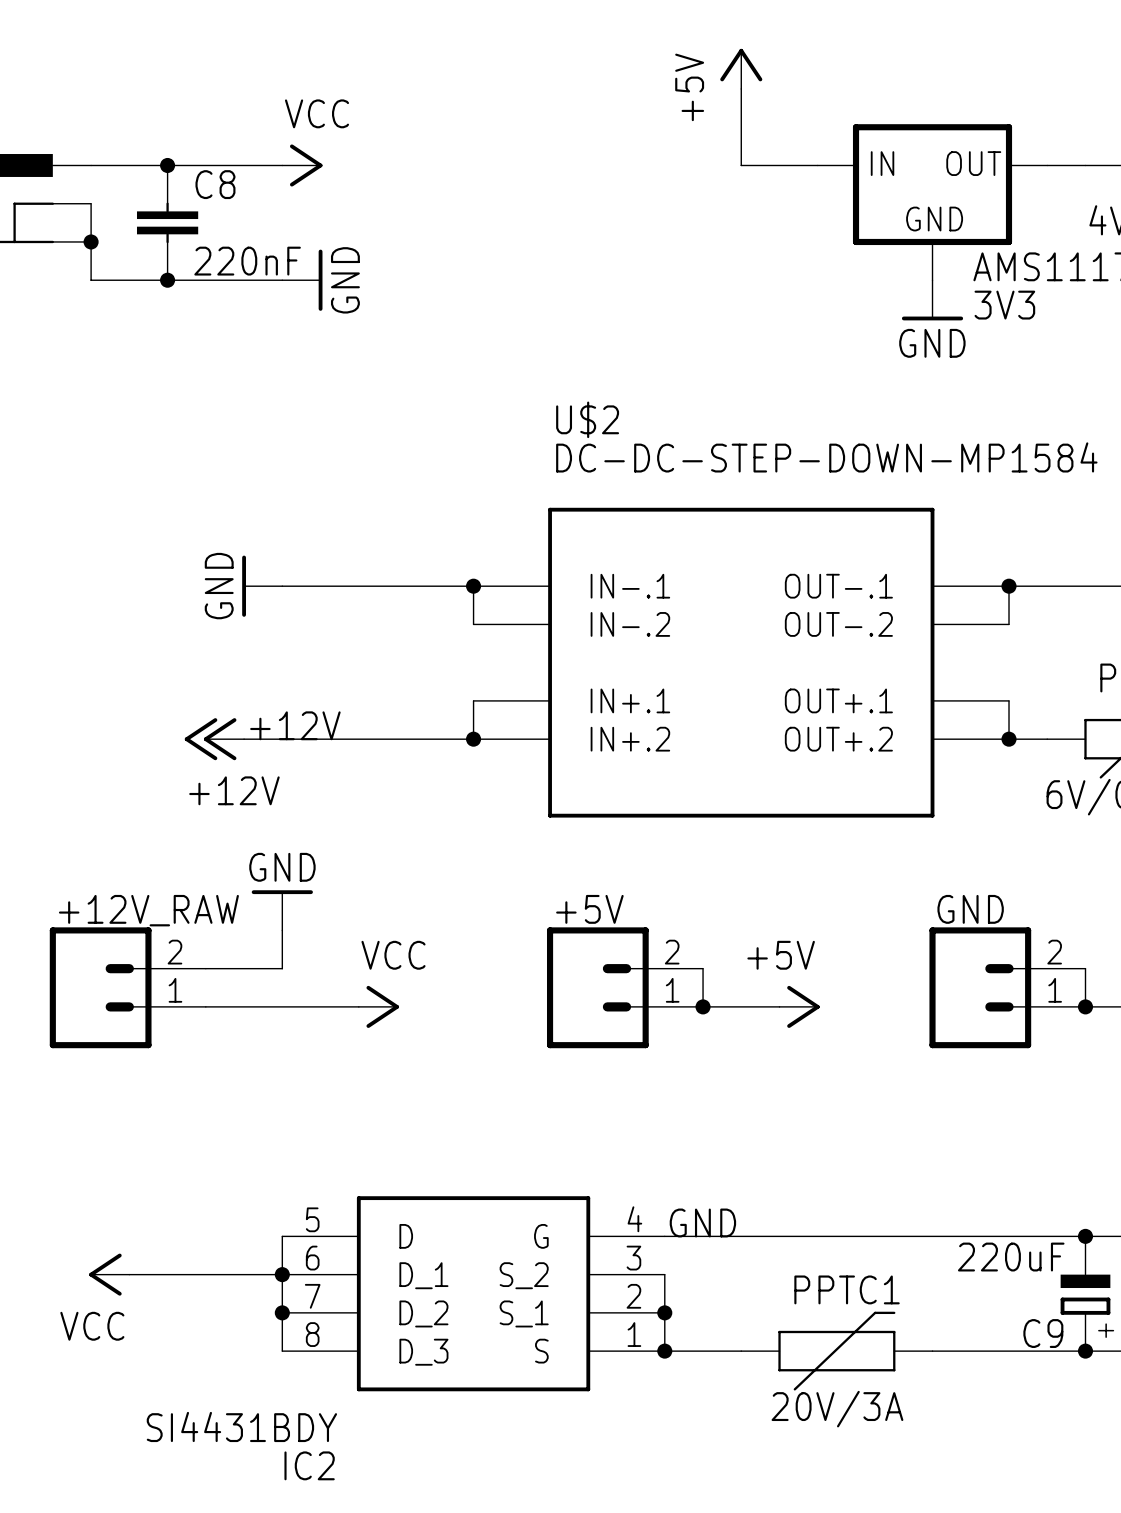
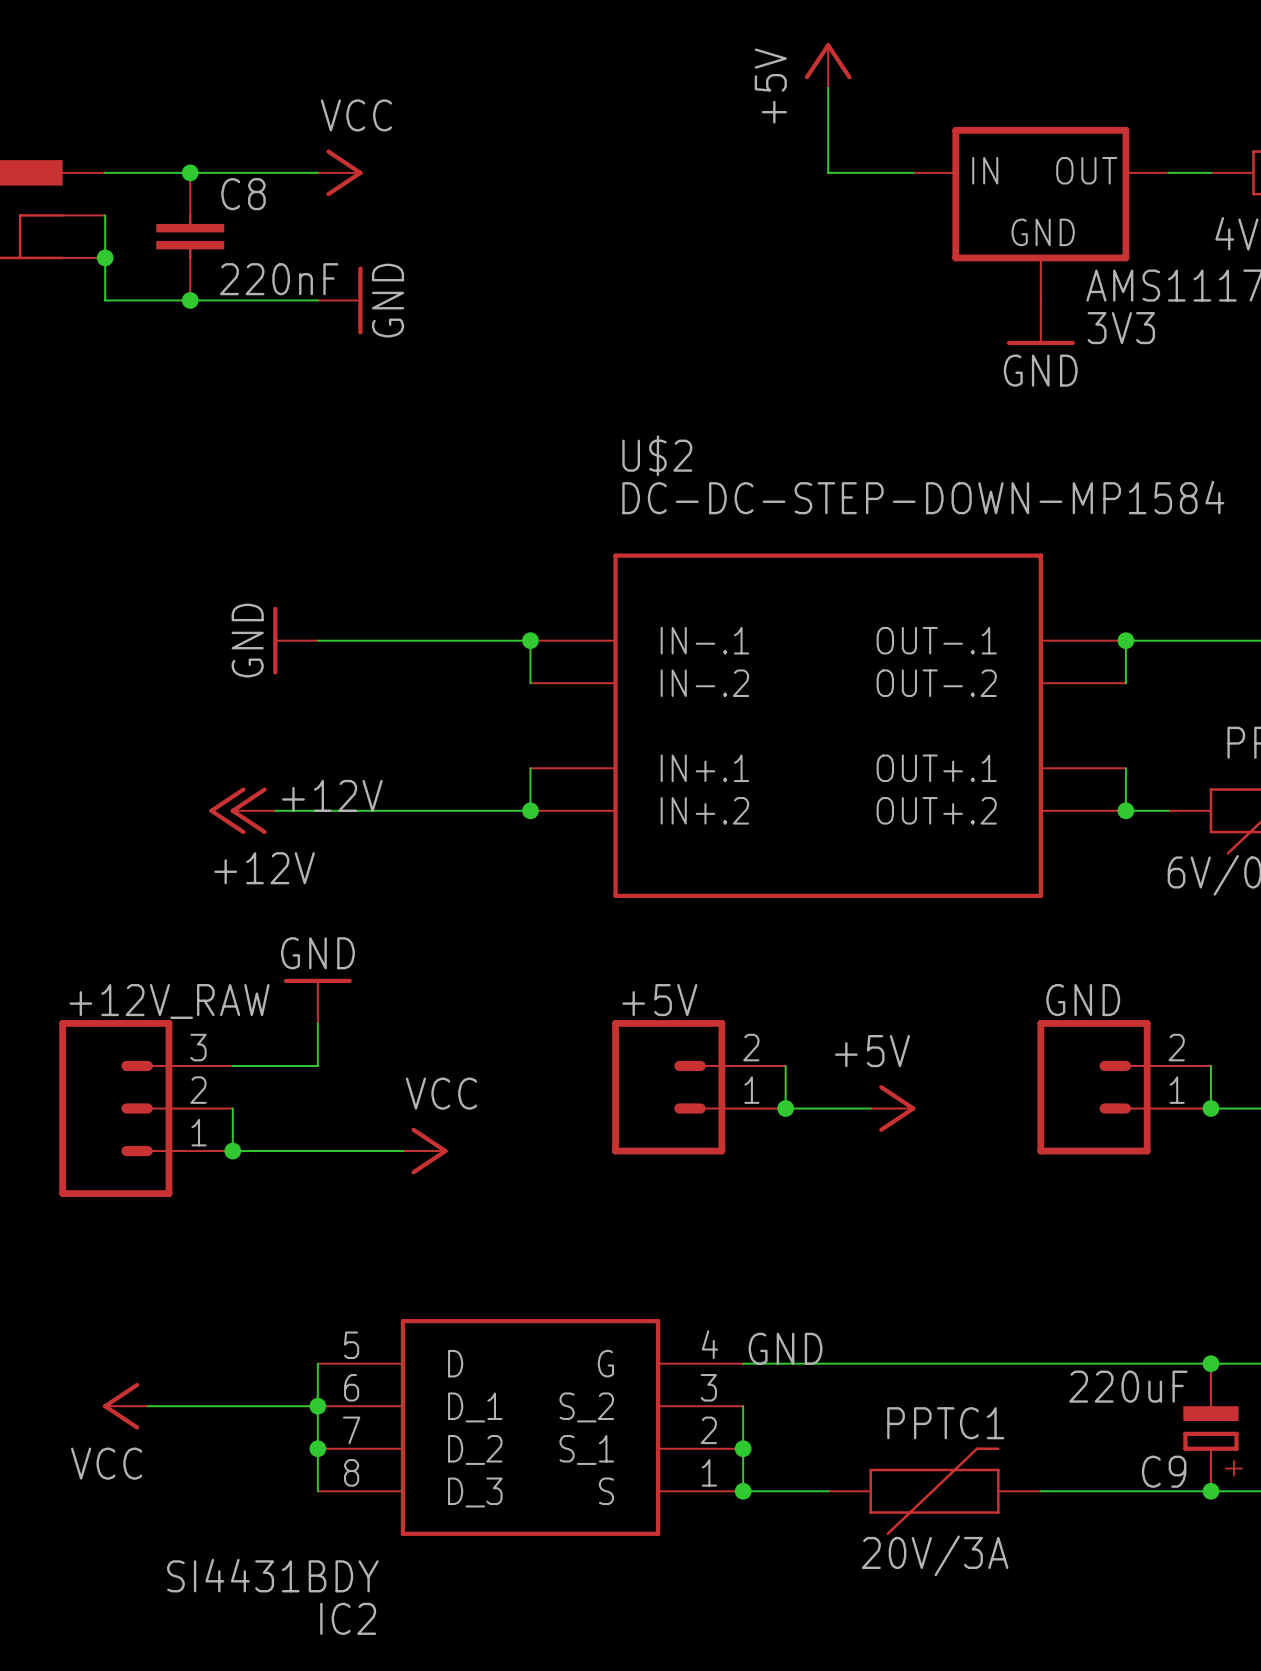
+12V_RAW symbol: [49, 927, 206, 1049] -> [59, 1020, 233, 1197]
wire: (205, 1006) (358, 1006) -> (232, 1108) (232, 1151) (402, 1151)
power symbol position: VCC (378, 1006) -> VCC (425, 1151)
junction: none -> (232, 1151)

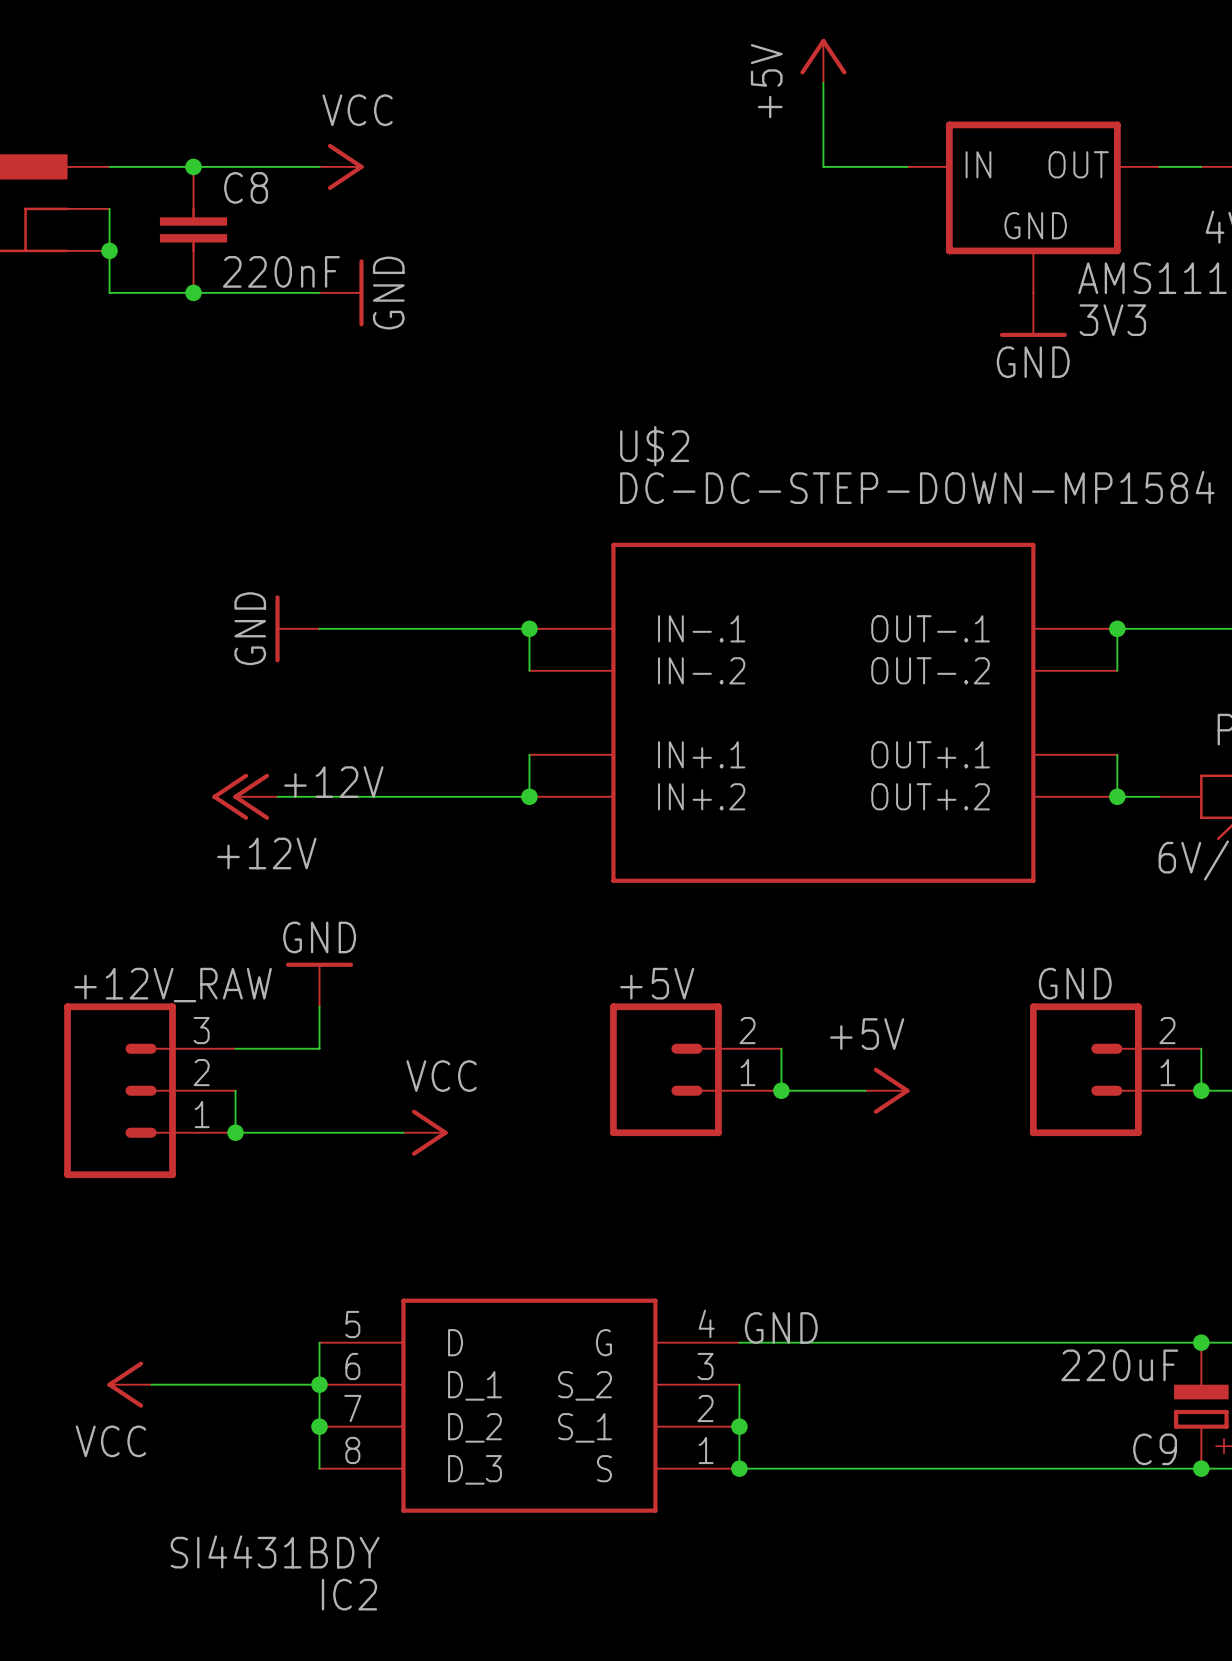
wire: none -> (823, 1468) (1033, 1468)
PPTC1: 20V/3A (934, 1491) -> none

